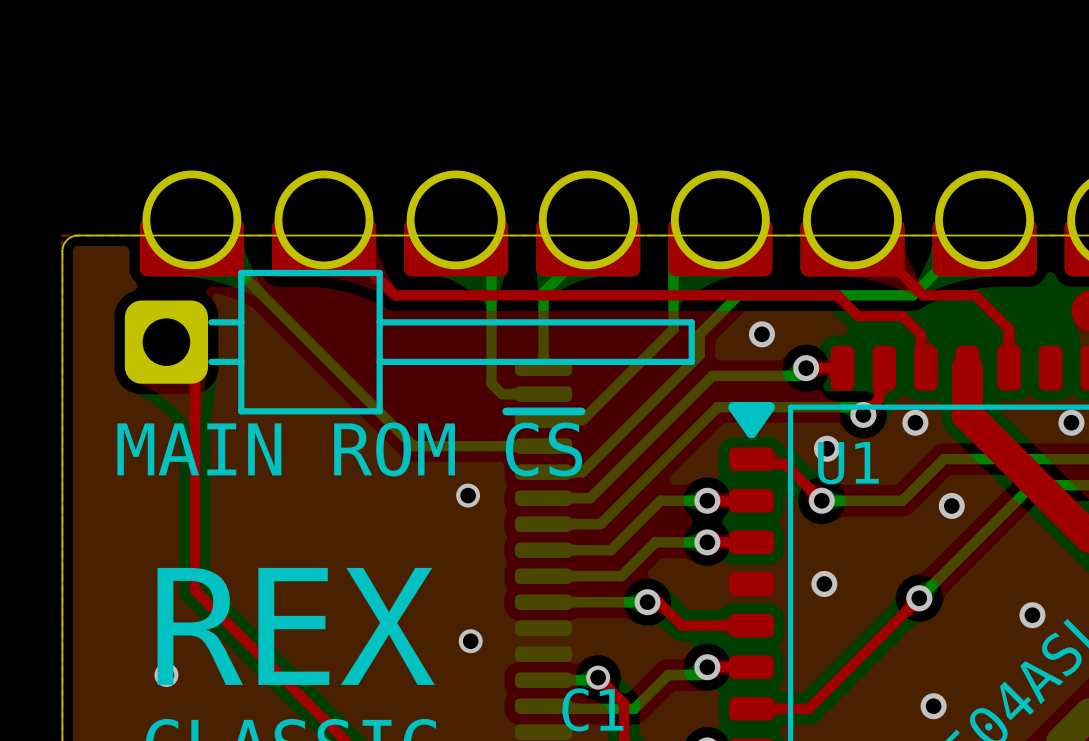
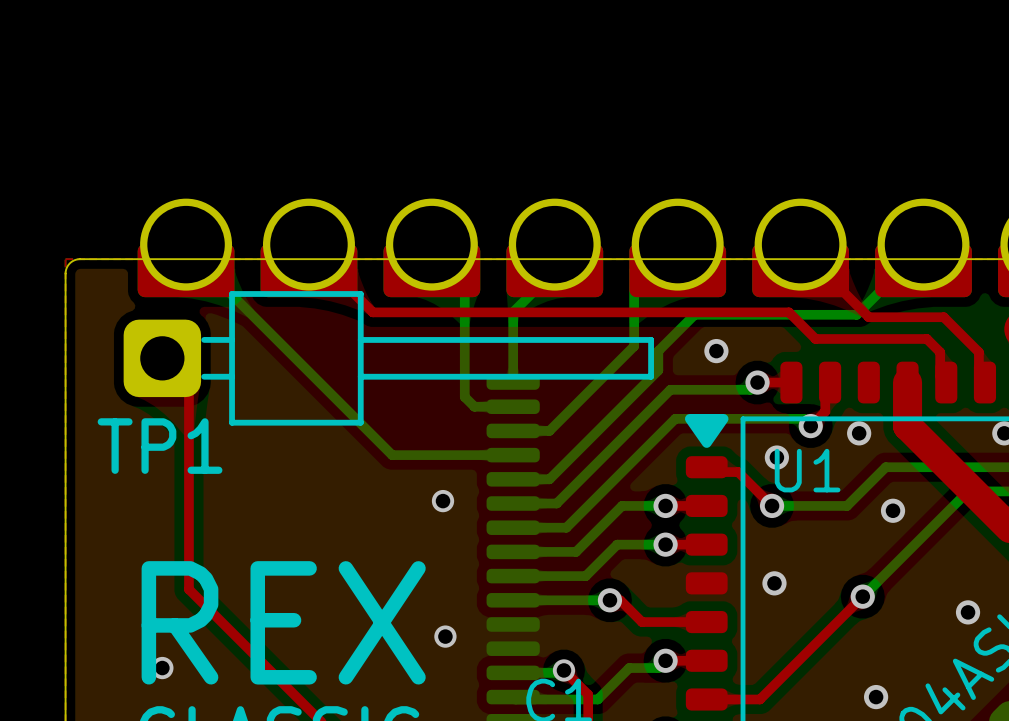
top track: (392, 292) (395, 295) (837, 295) (858, 316) (902, 316) (920, 334) (920, 362) (925, 368) -> (372, 312) (788, 312) (815, 338) (926, 338) (940, 352) (940, 376) (946, 382)
top track: (923, 295) (975, 295) (1009, 329) (1009, 368) -> (866, 314) (868, 317) (943, 317) (978, 352) (978, 376) (984, 382)
TP1 name: none -> TP1 (160, 446)
TP1 value: MAIN ROM ~{CS} (349, 443) -> none

